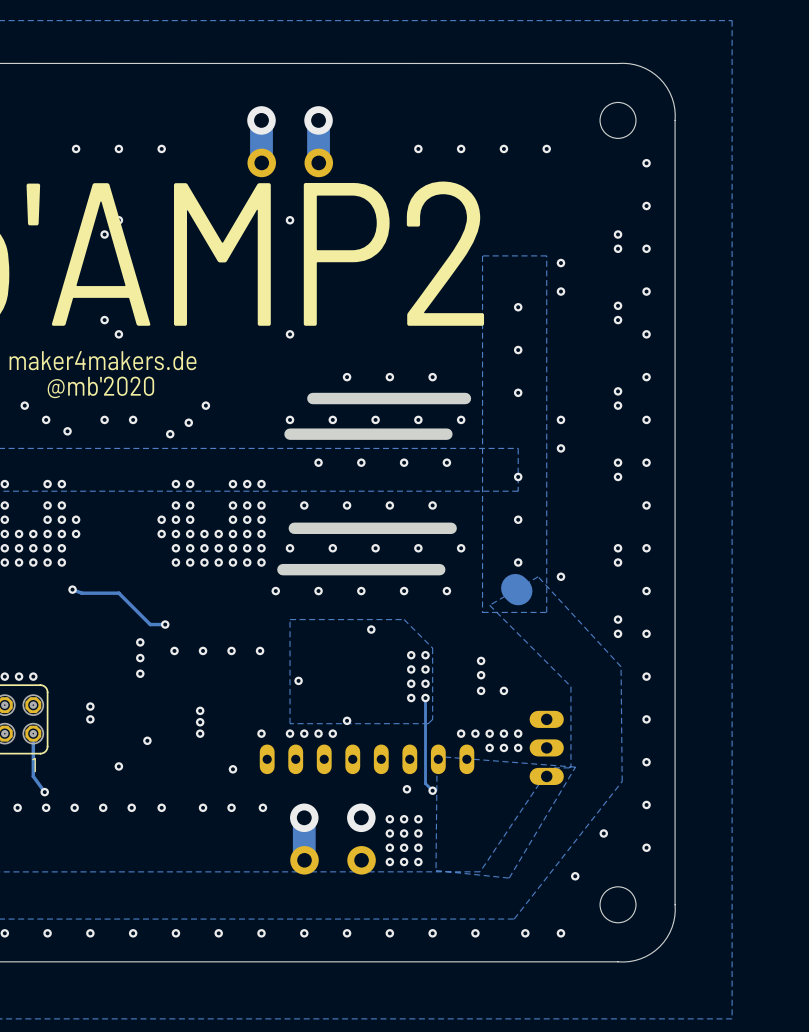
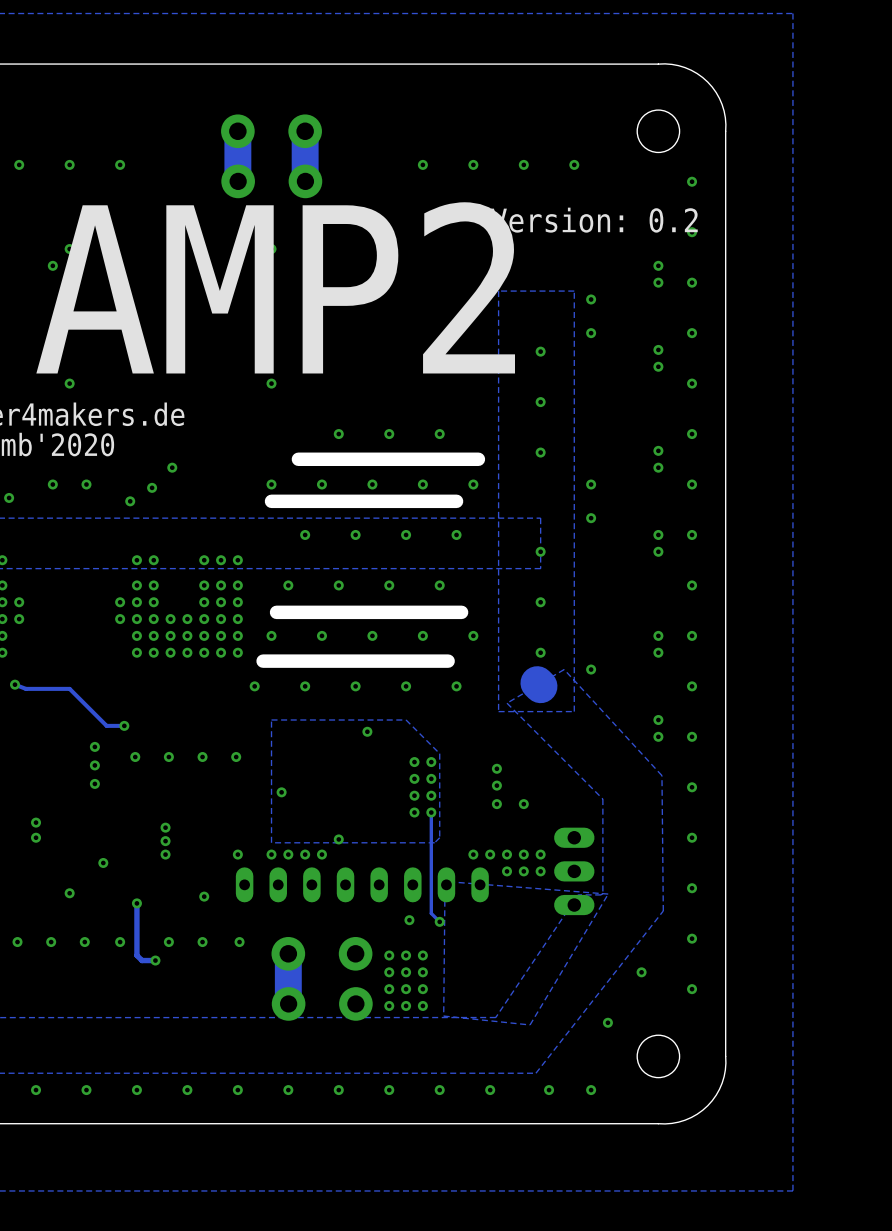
text: none -> Version: 0.2 (594, 220)
track: none -> (136, 903) (136, 955) (141, 960) (155, 960)
via: none -> (136, 903)
via: none -> (155, 960)

